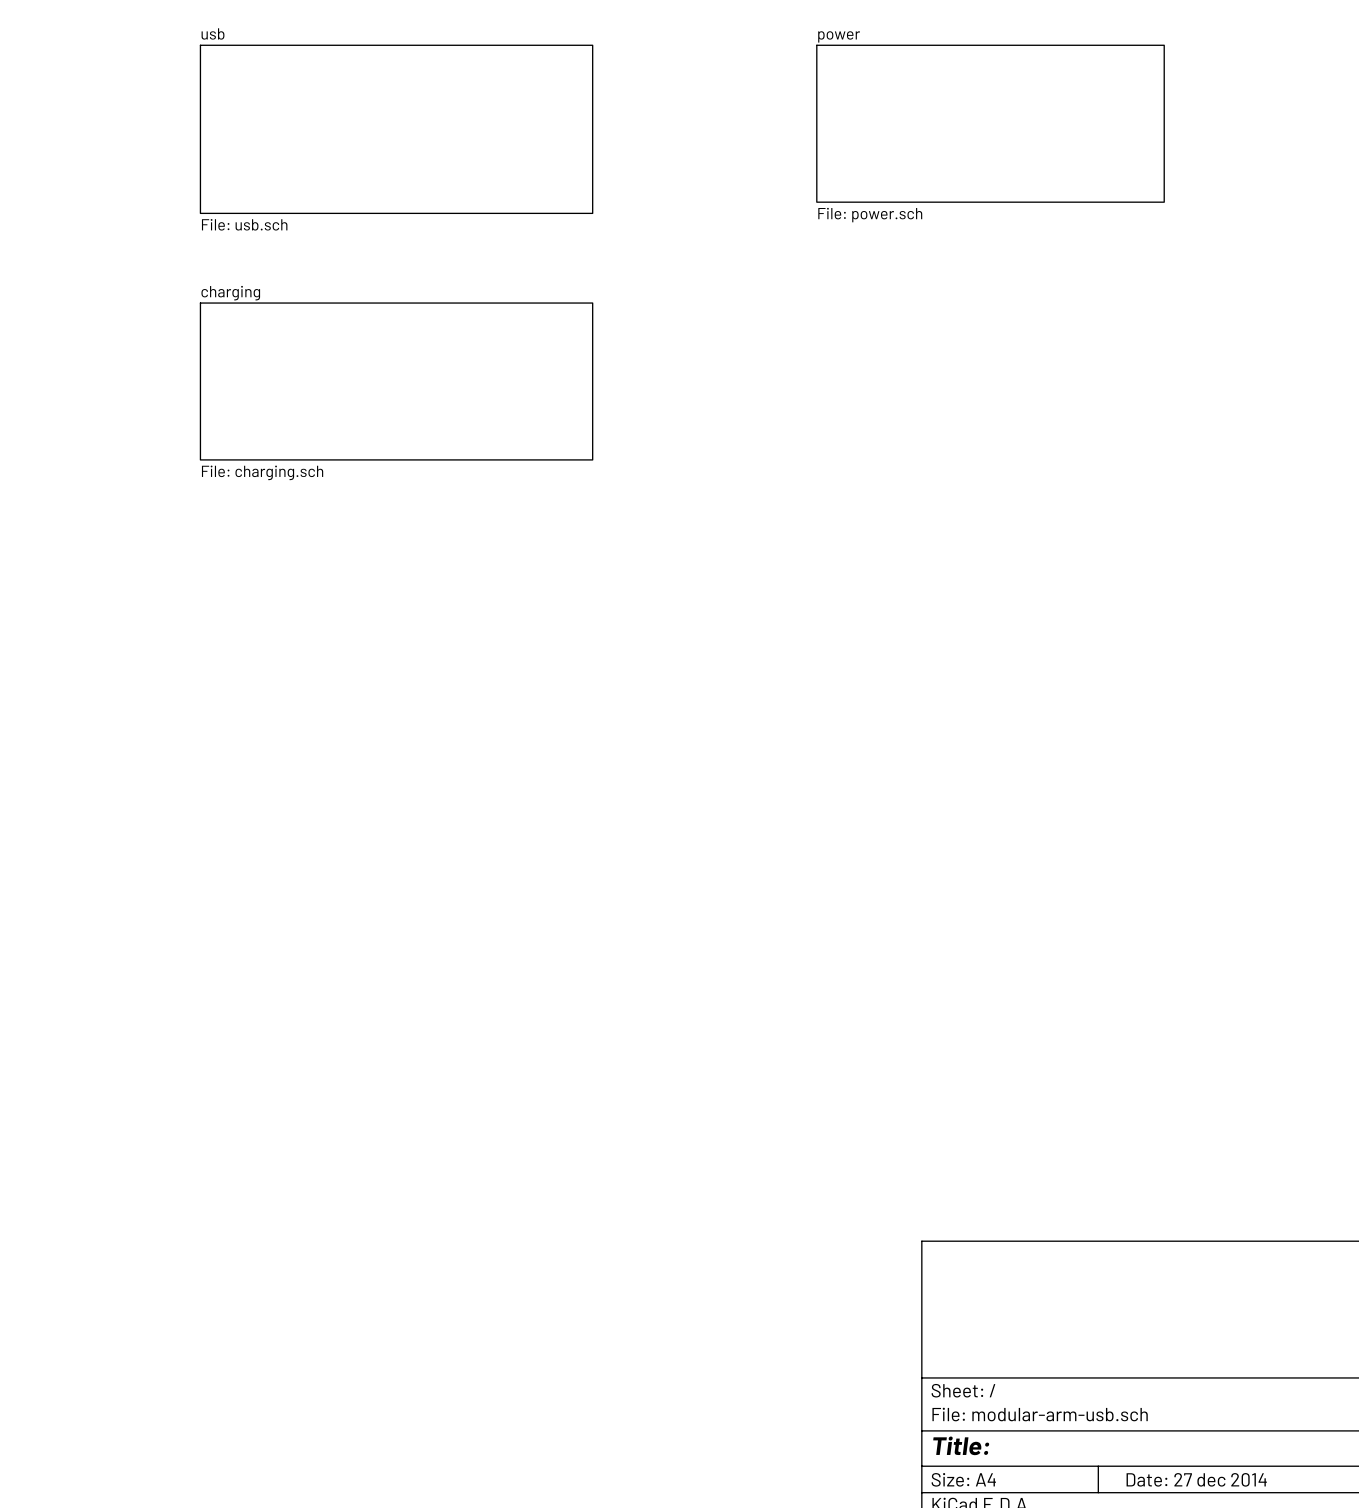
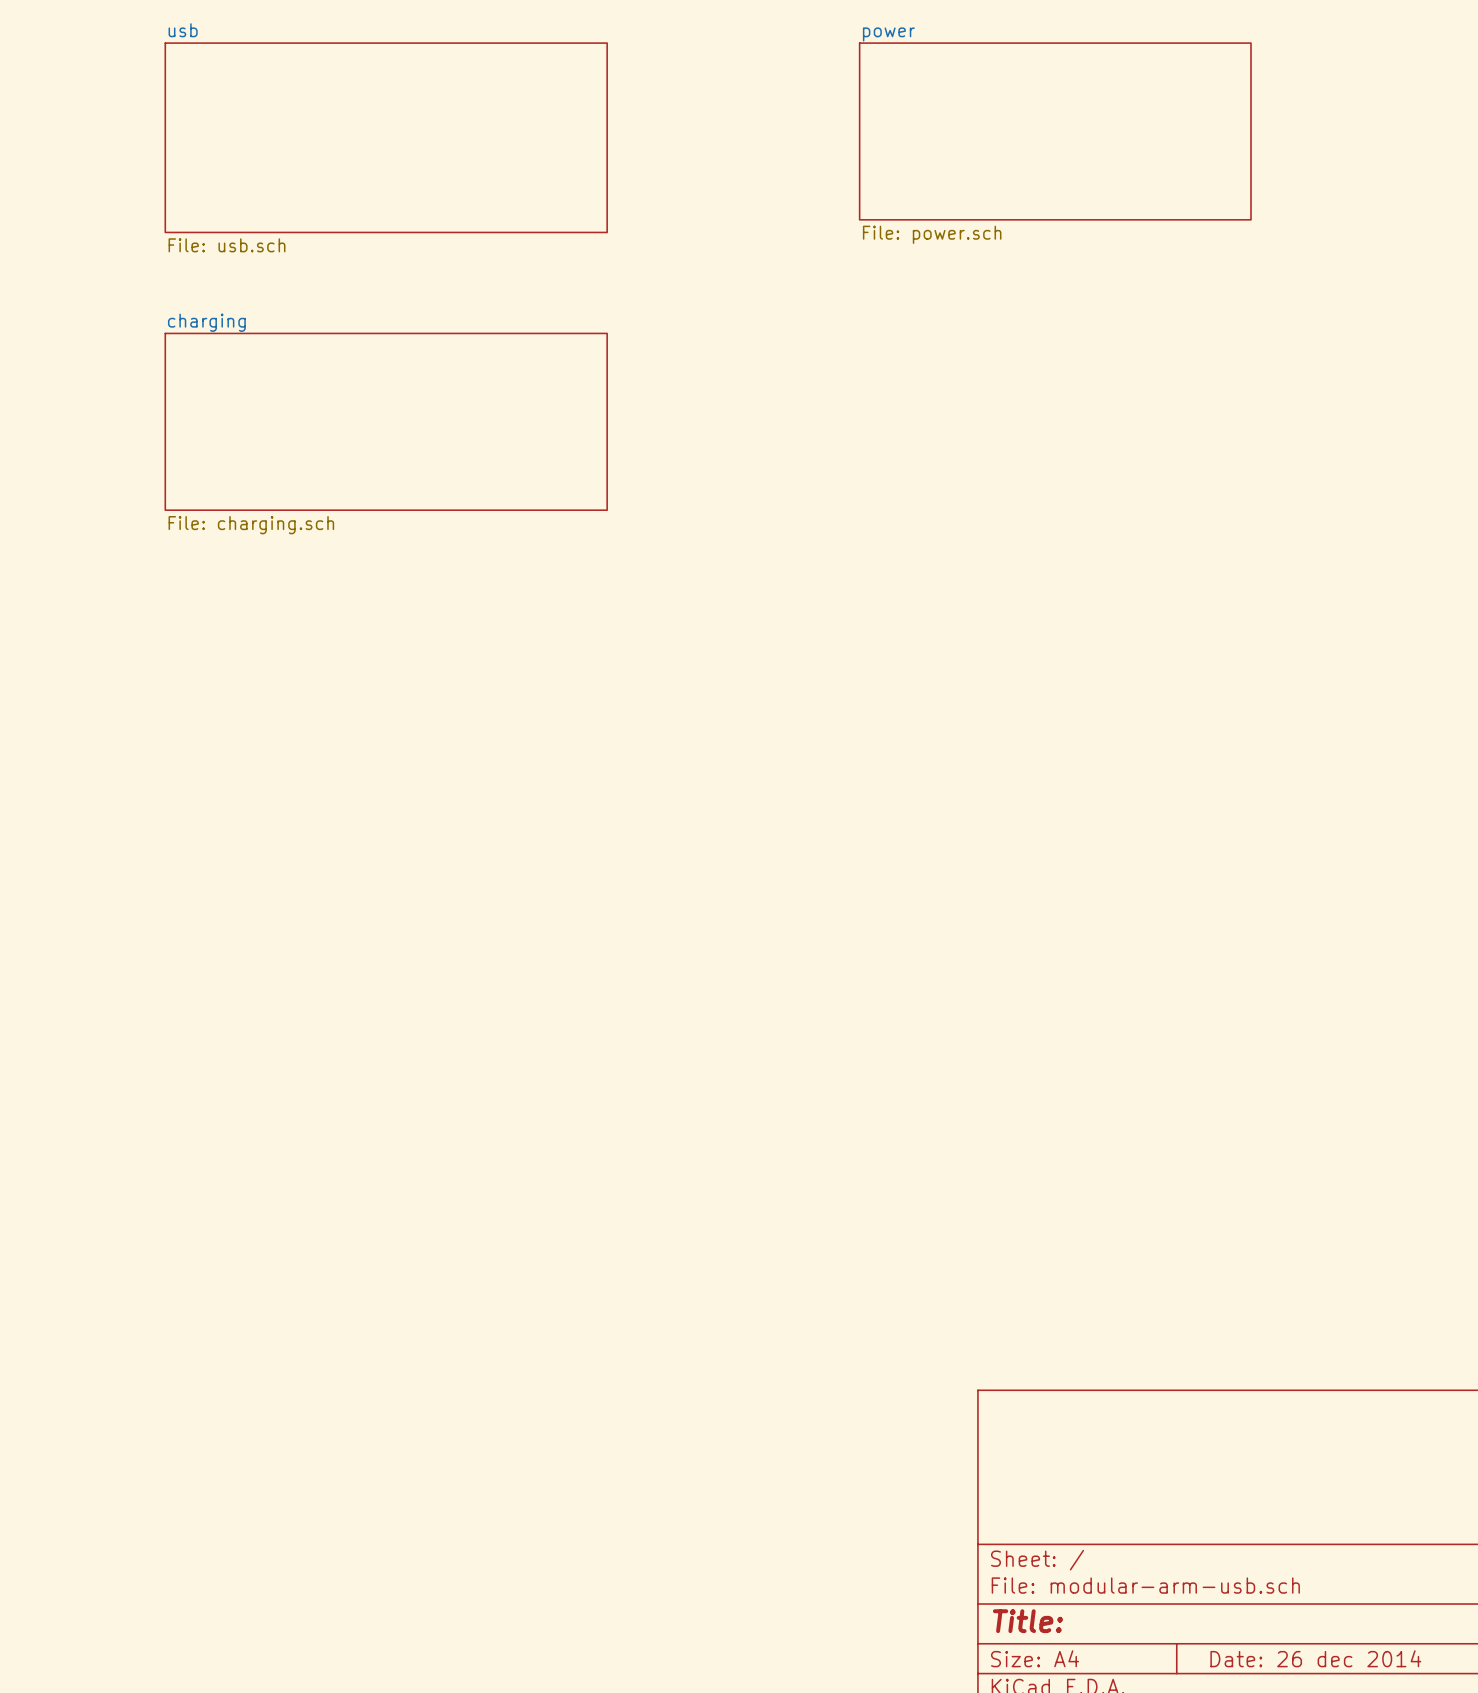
title block: Date: 27 dec 2014 (1196, 1479) -> Date: 26 dec 2014 (1315, 1658)

